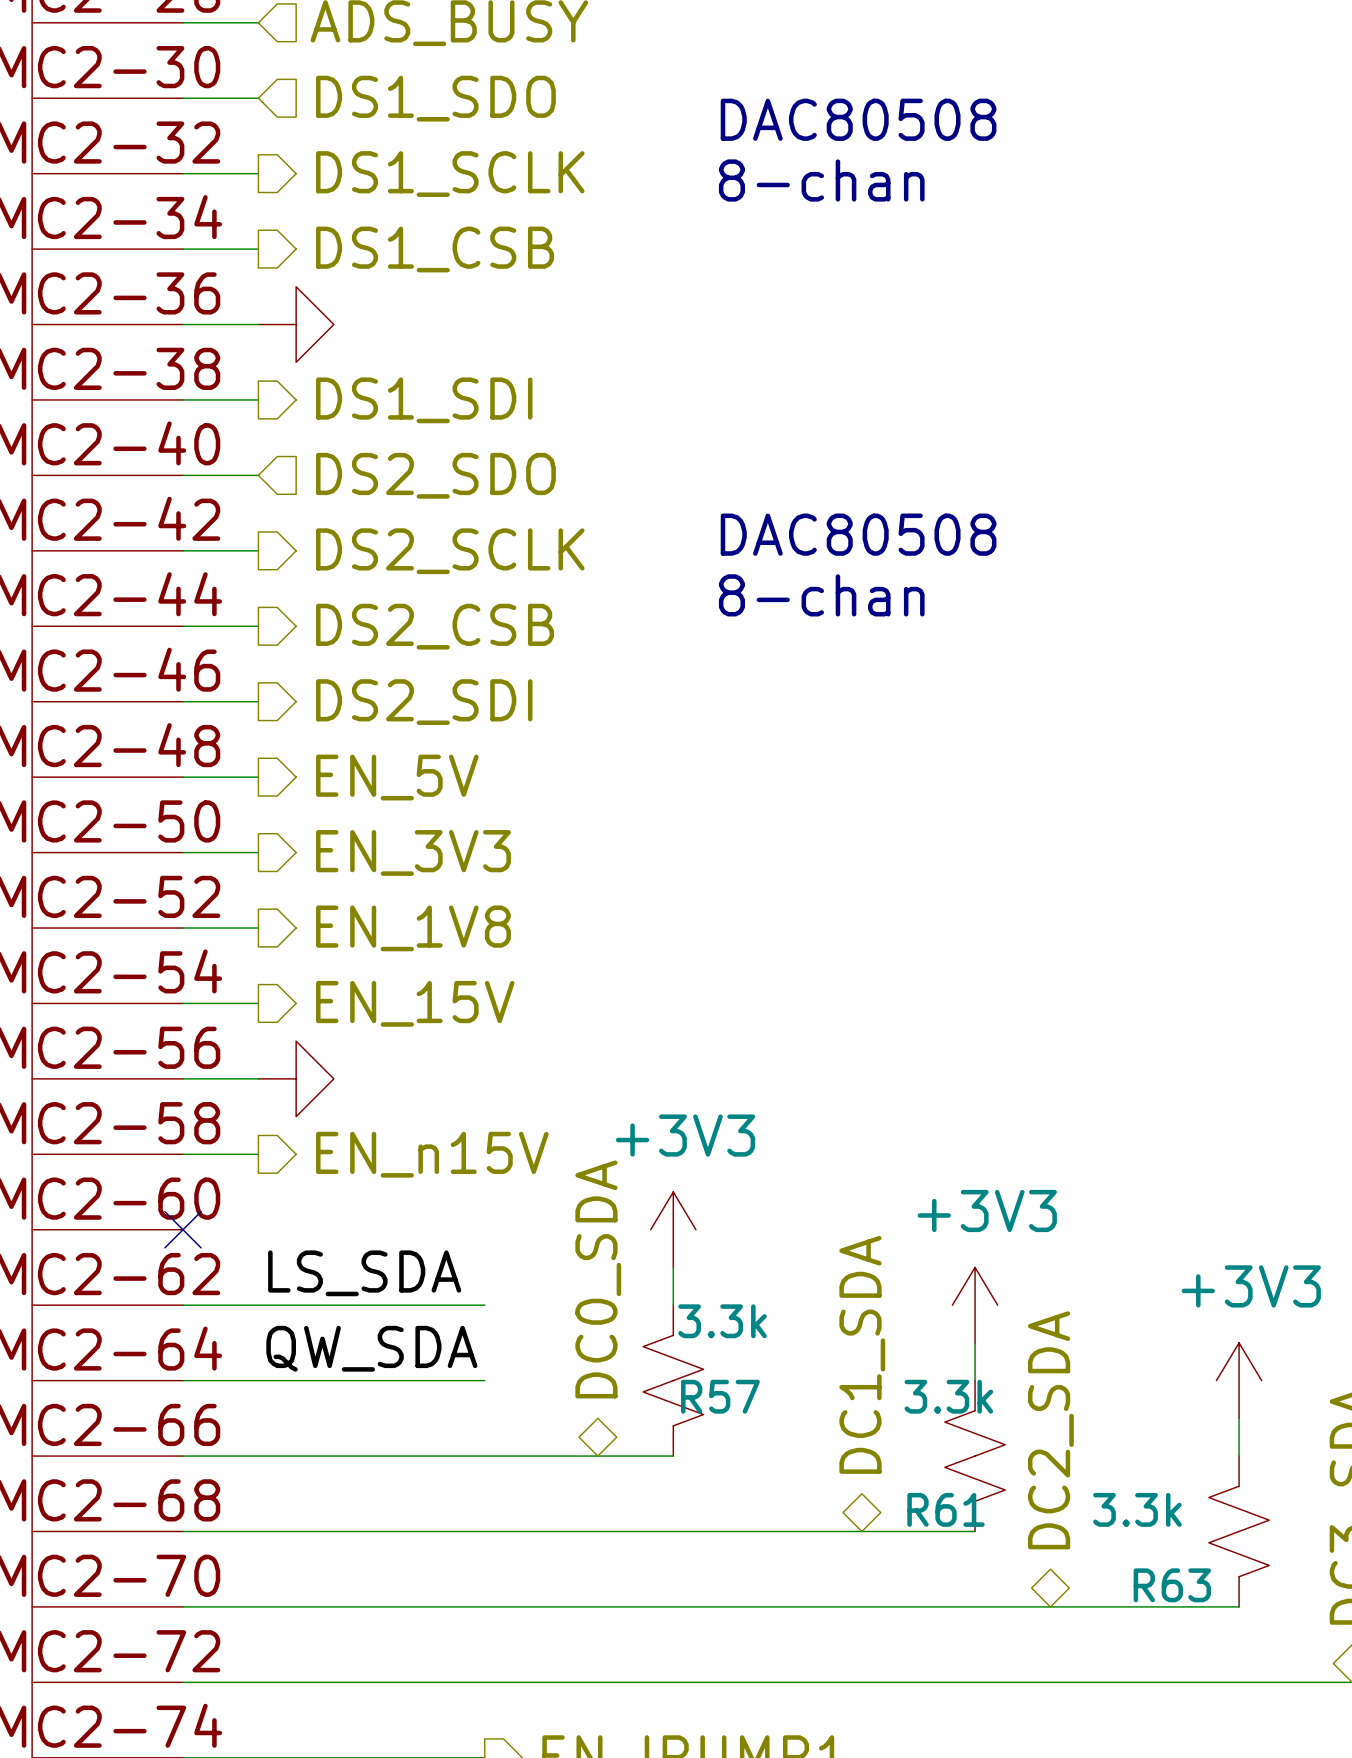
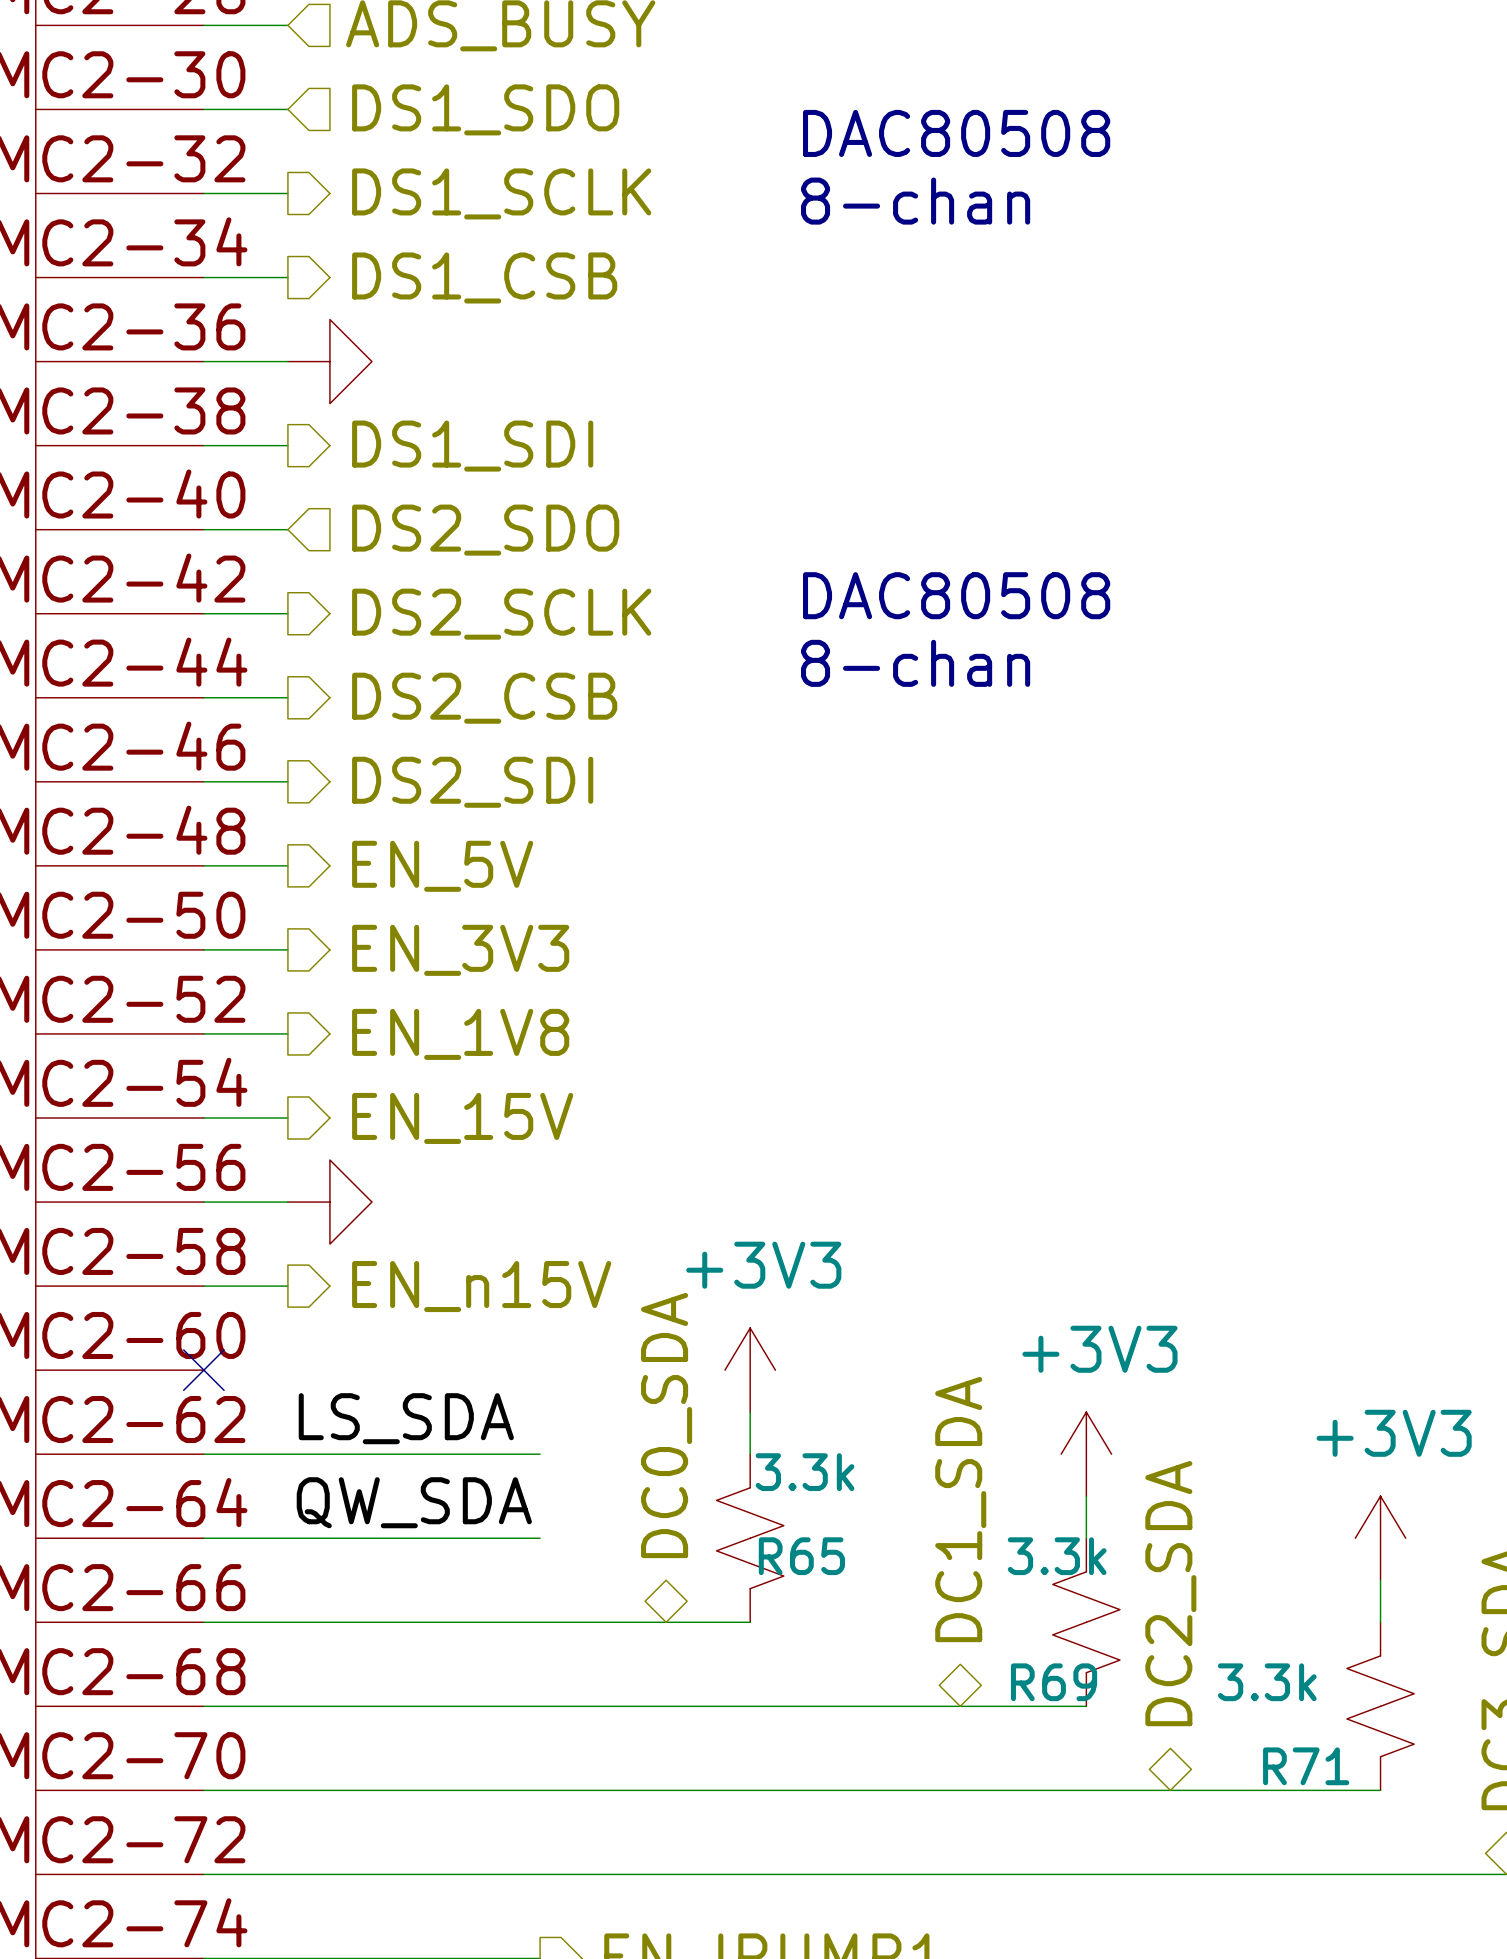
R57 name: R57 (720, 1396) -> R65 (801, 1556)
R61 name: R61 (946, 1509) -> R69 (1054, 1682)
R63 name: R63 (1172, 1585) -> R71 (1306, 1766)

